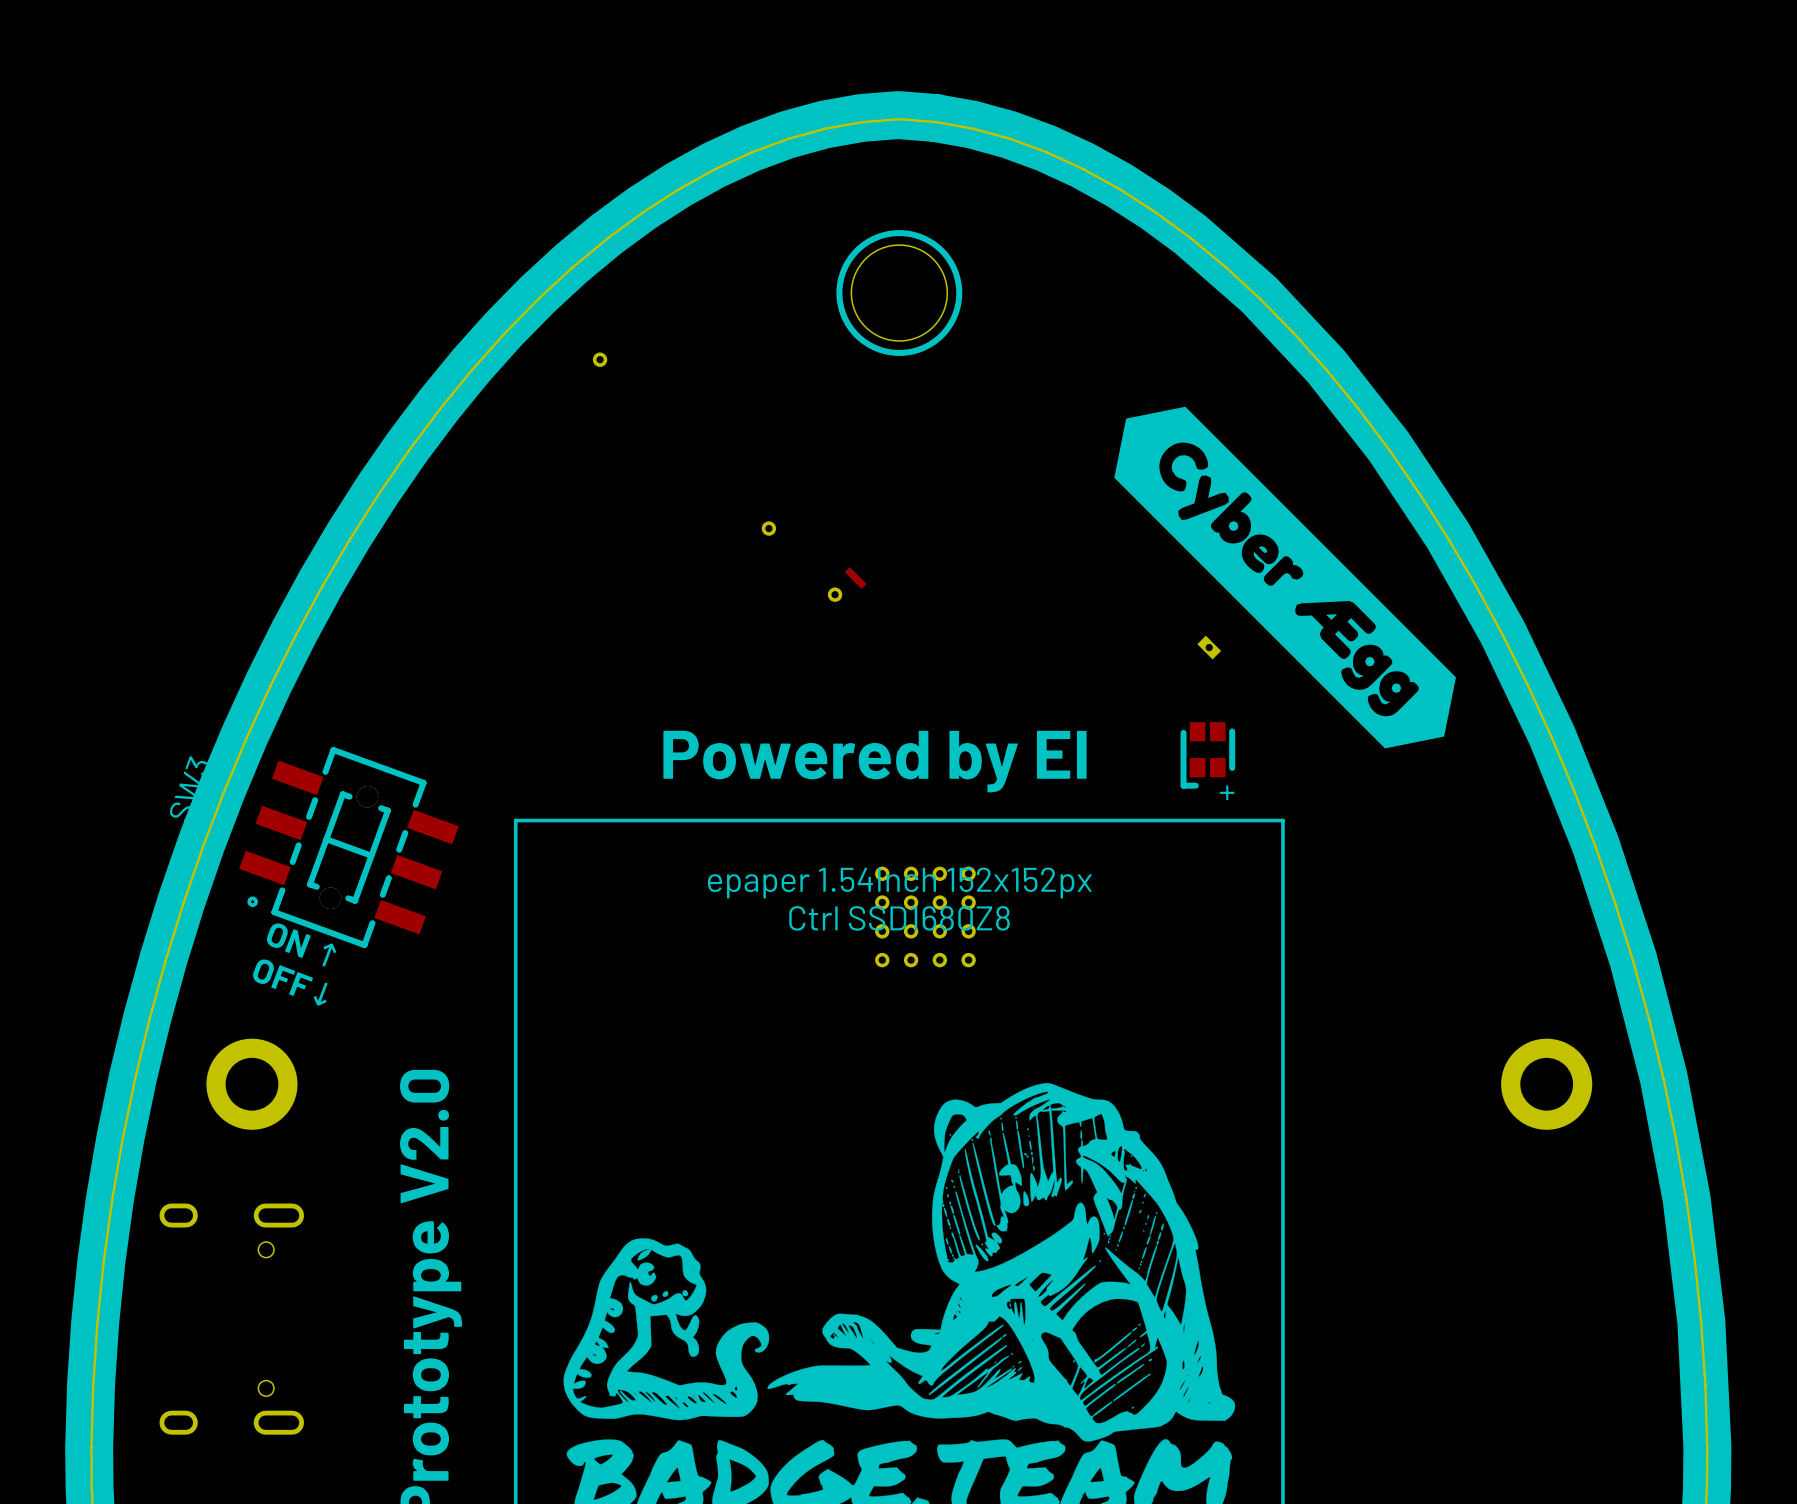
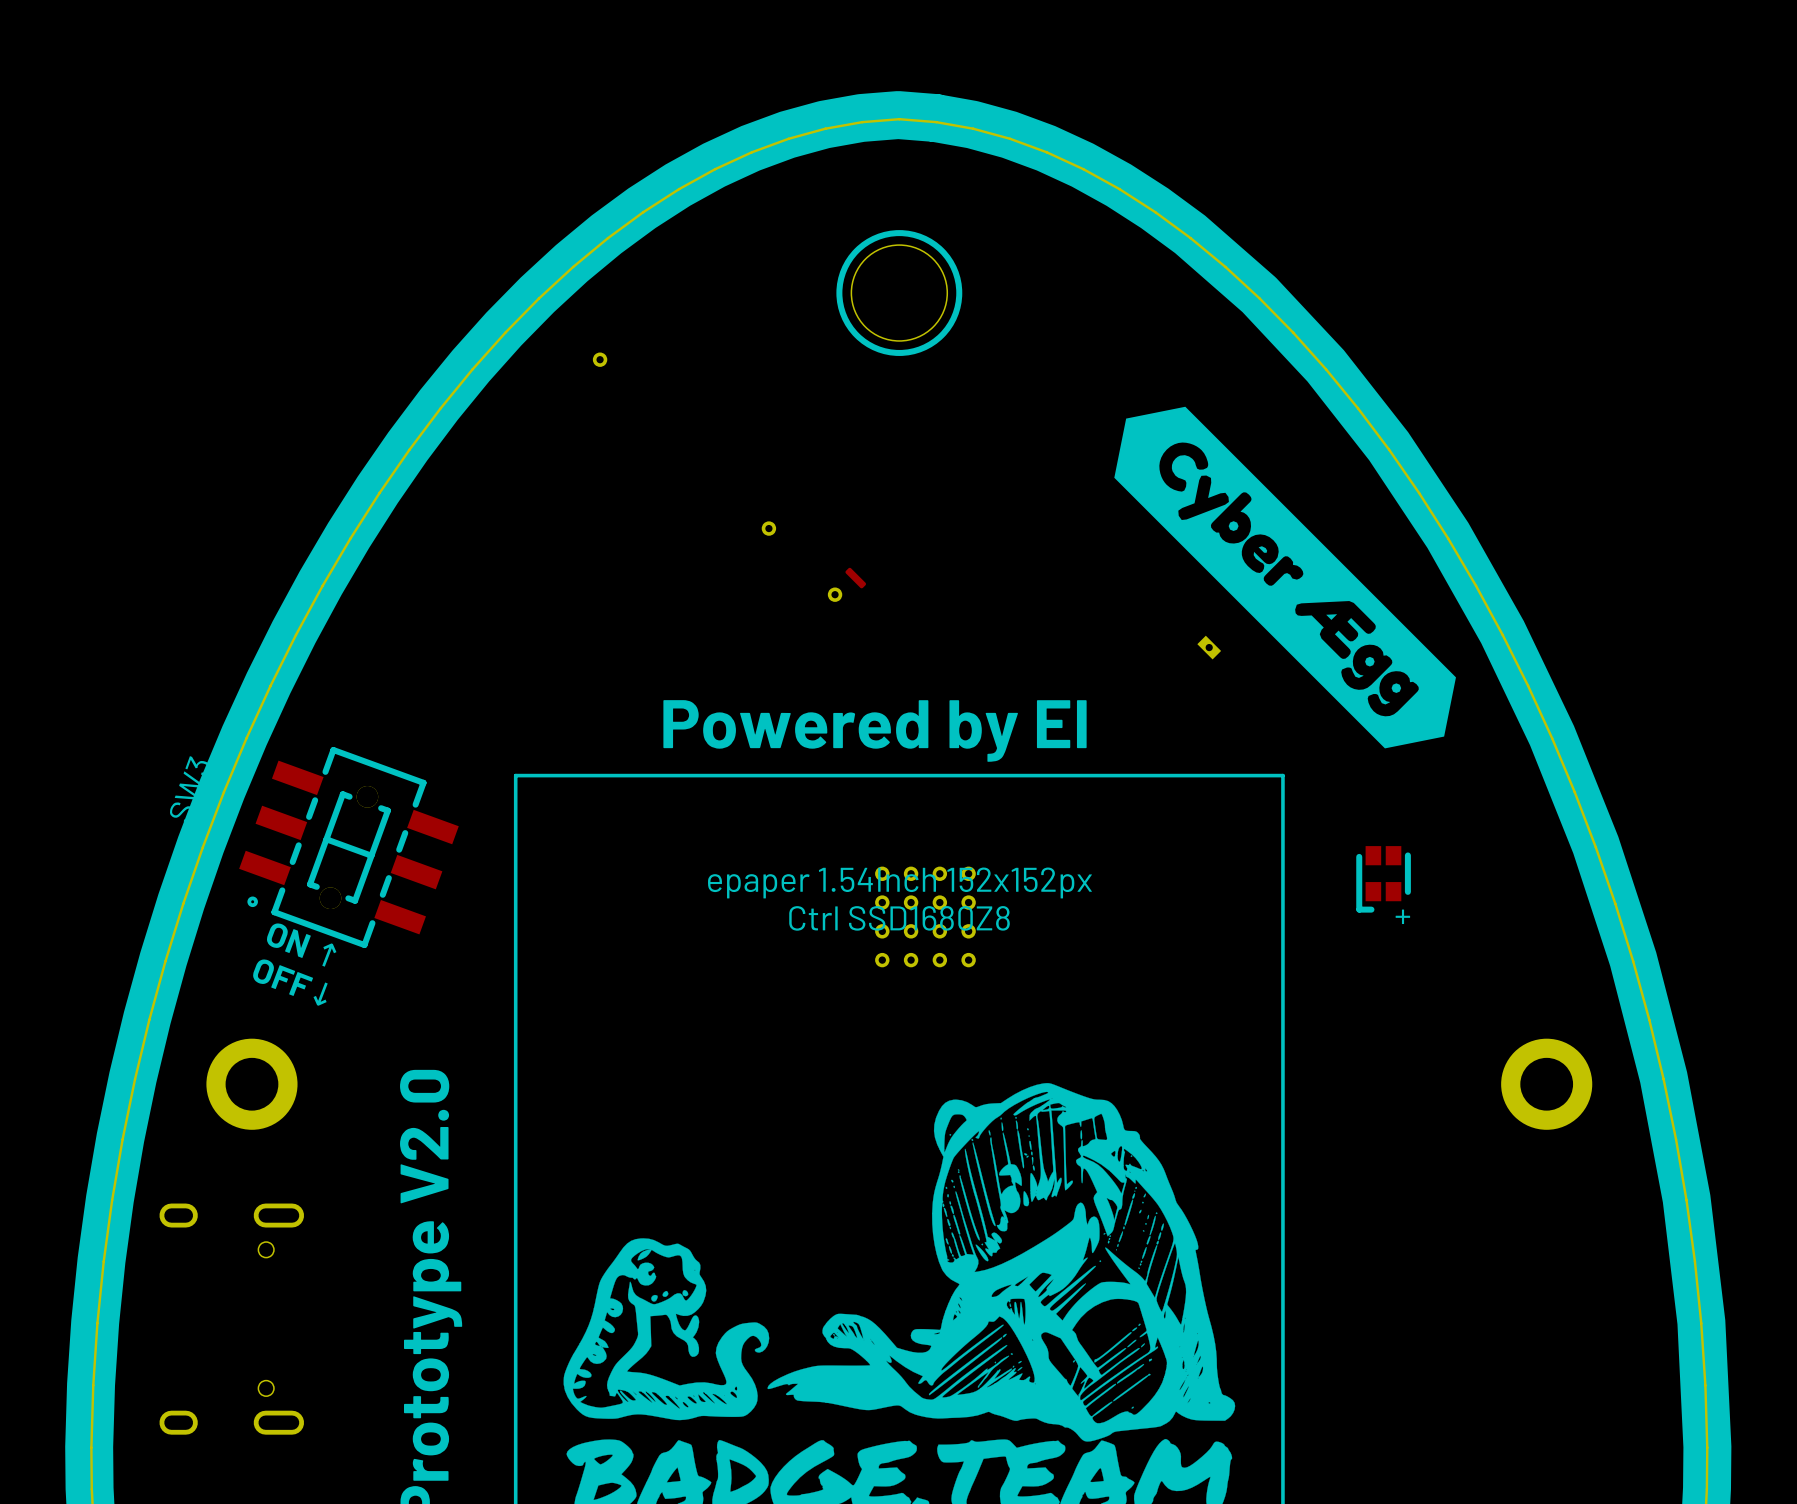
part position: (1207, 755) -> (1383, 879)
text position: Powered by EI (875, 761) -> Powered by EI (875, 730)
line: (515, 820) (1282, 820) -> (515, 820) (515, 775) (1282, 775) (1282, 820)

